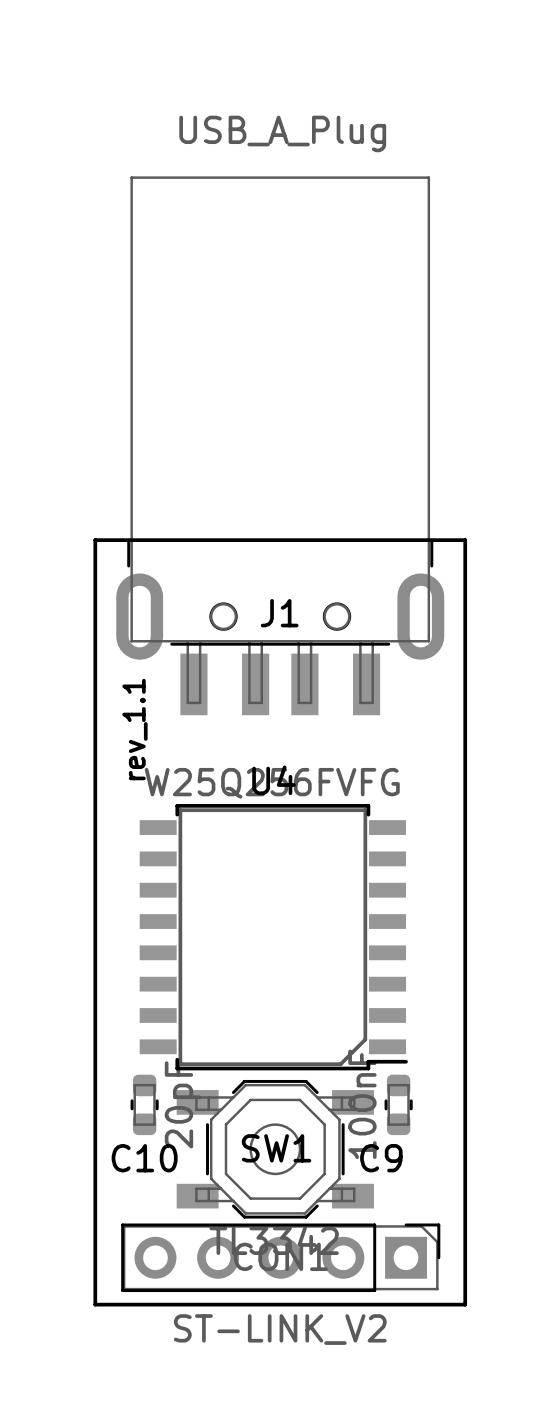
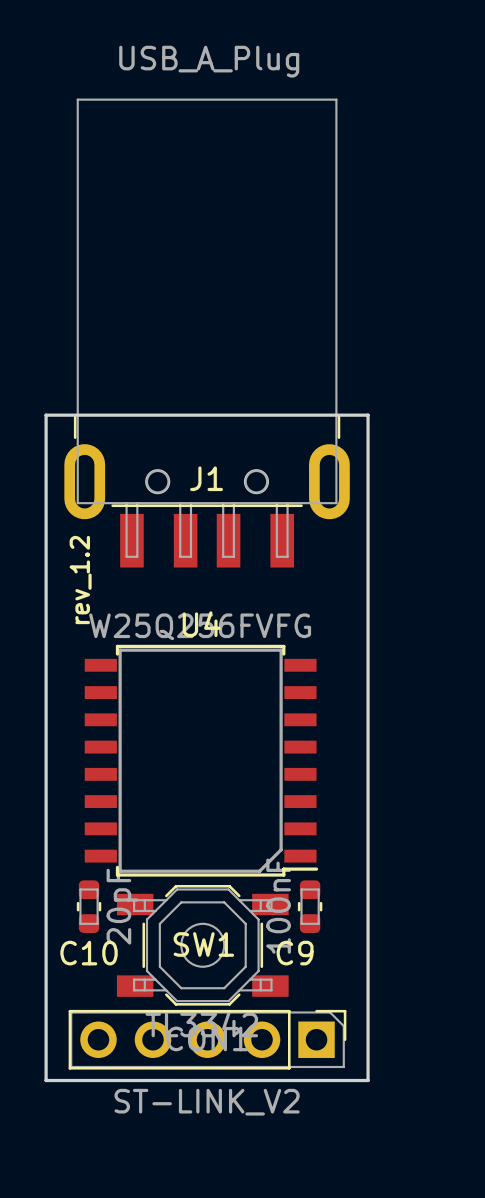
text: rev_1.1 (134, 729) -> rev_1.2 (80, 580)

